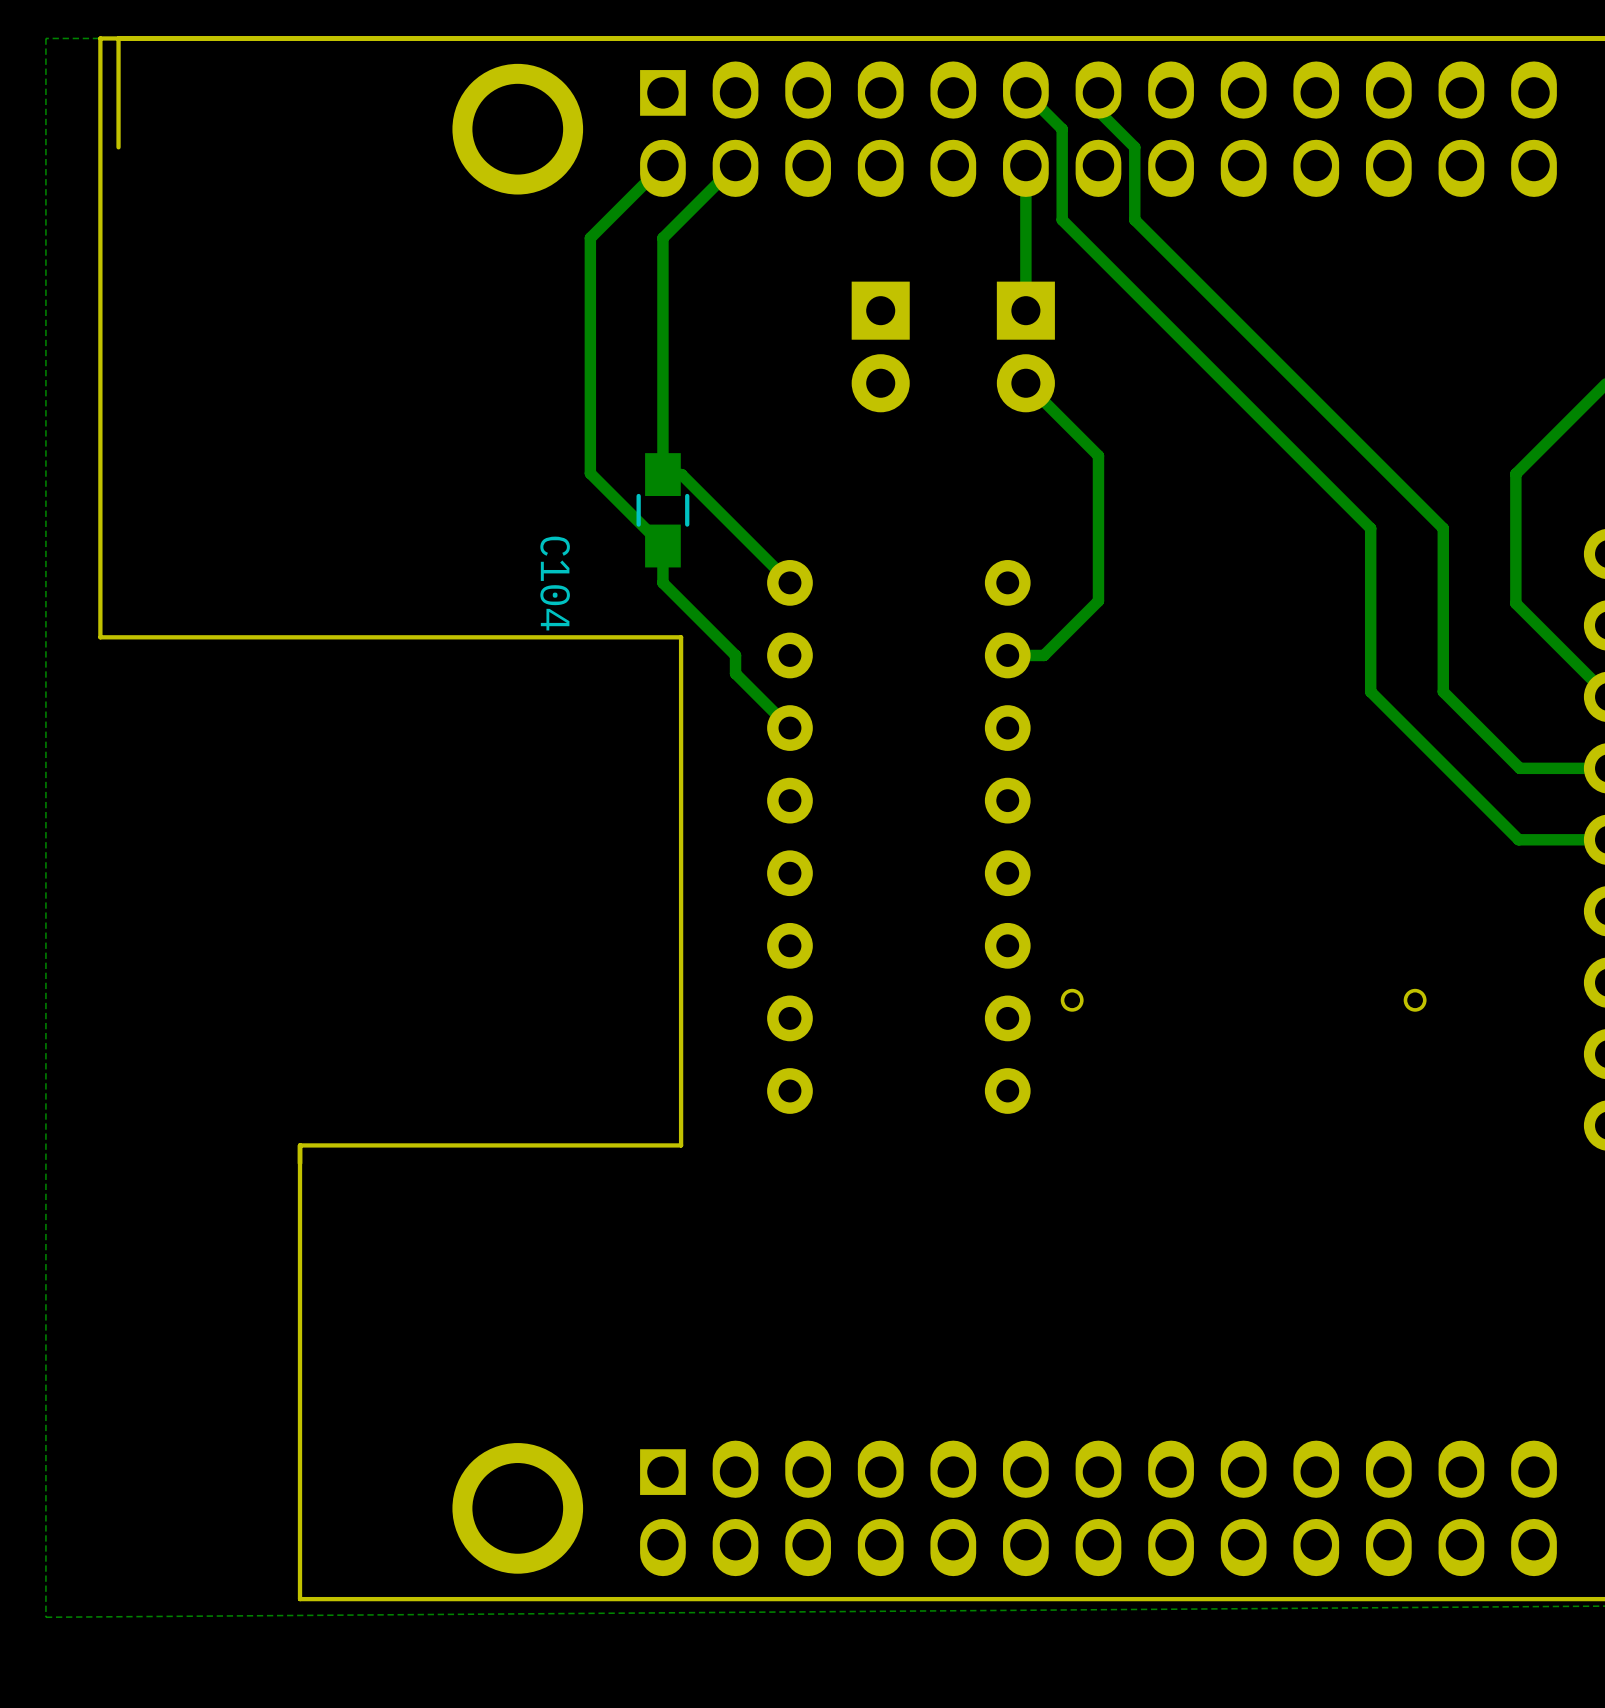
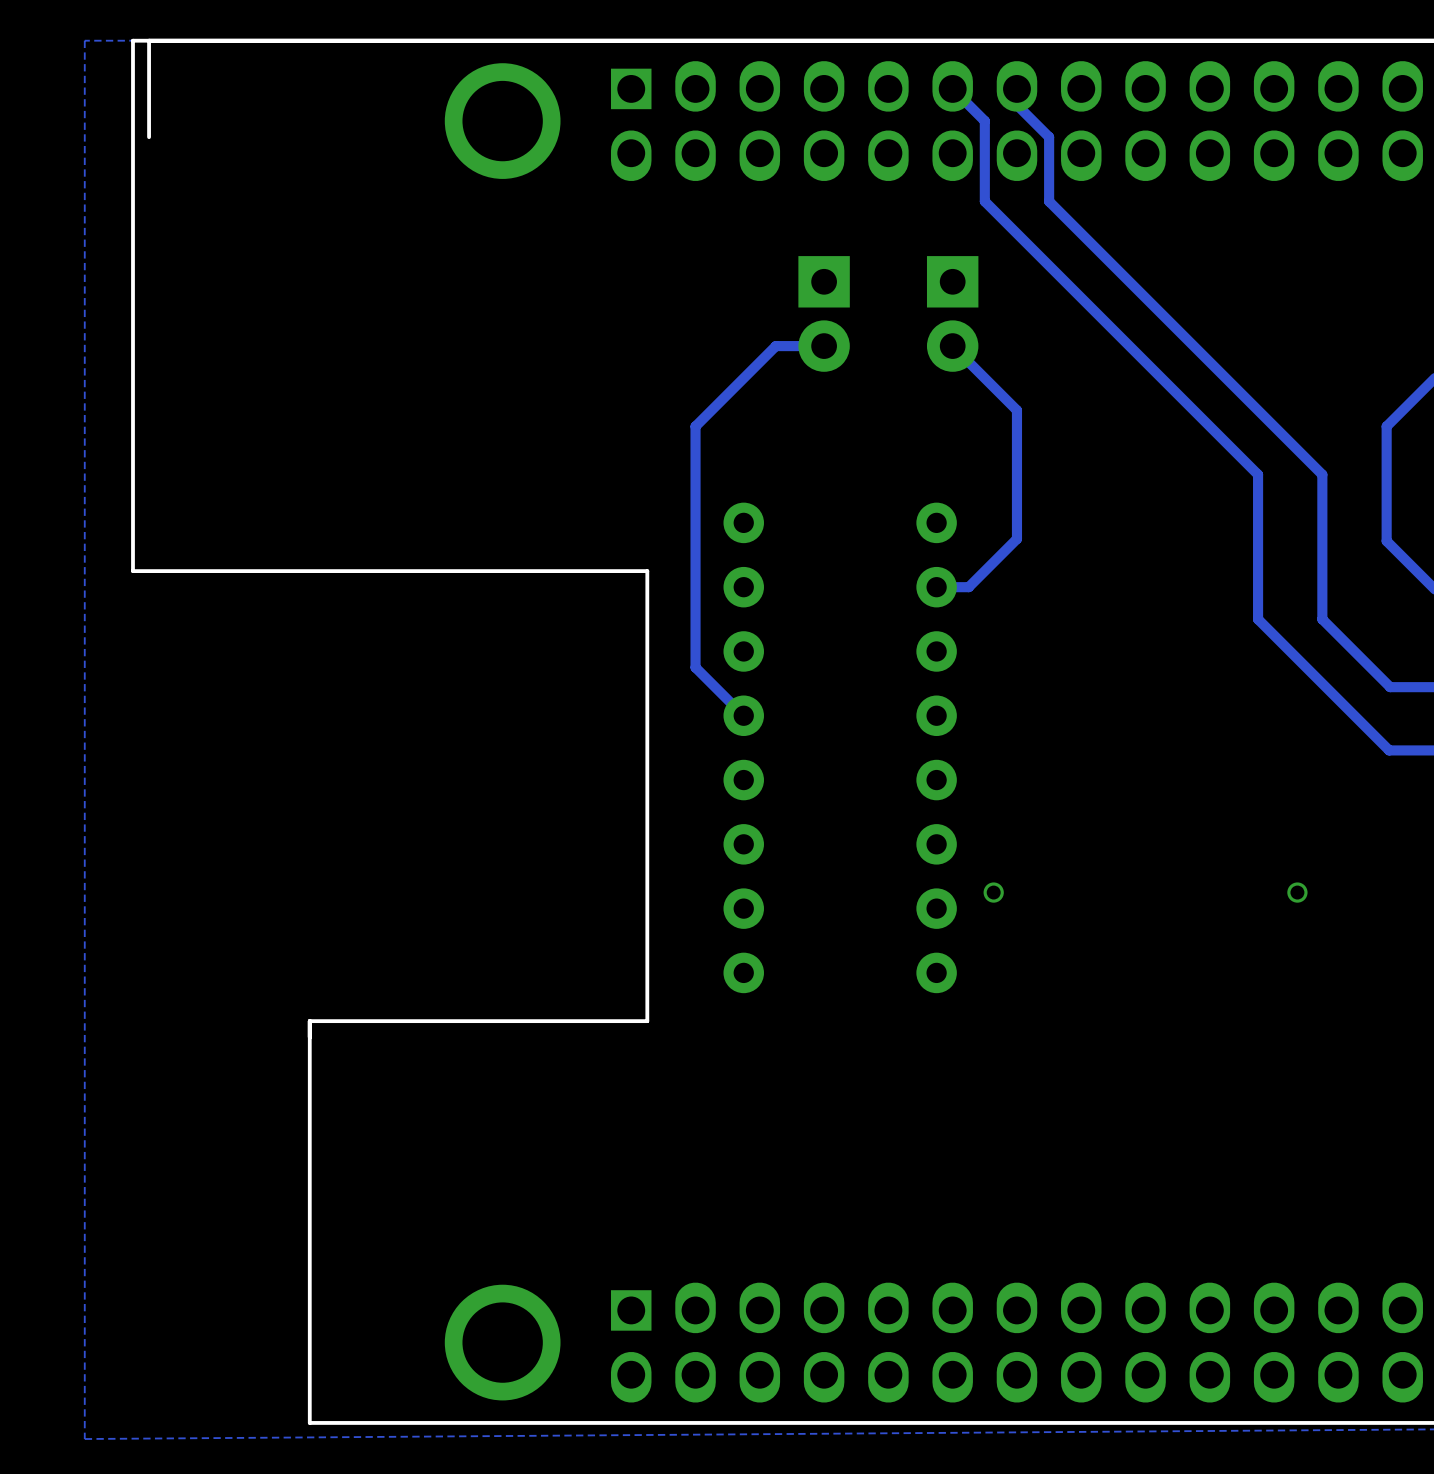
track: (662, 165) (590, 238) (590, 473) (662, 546) (662, 582) (735, 655) -> (824, 346) (775, 346) (695, 426) (695, 587)
track: (735, 165) (662, 238) (662, 474) (681, 474) (789, 582) -> none
track: (1025, 165) (1025, 310) -> none
C104: (662, 510) -> none
track: (735, 673) (789, 728) -> (695, 603) (695, 667) (743, 715)

